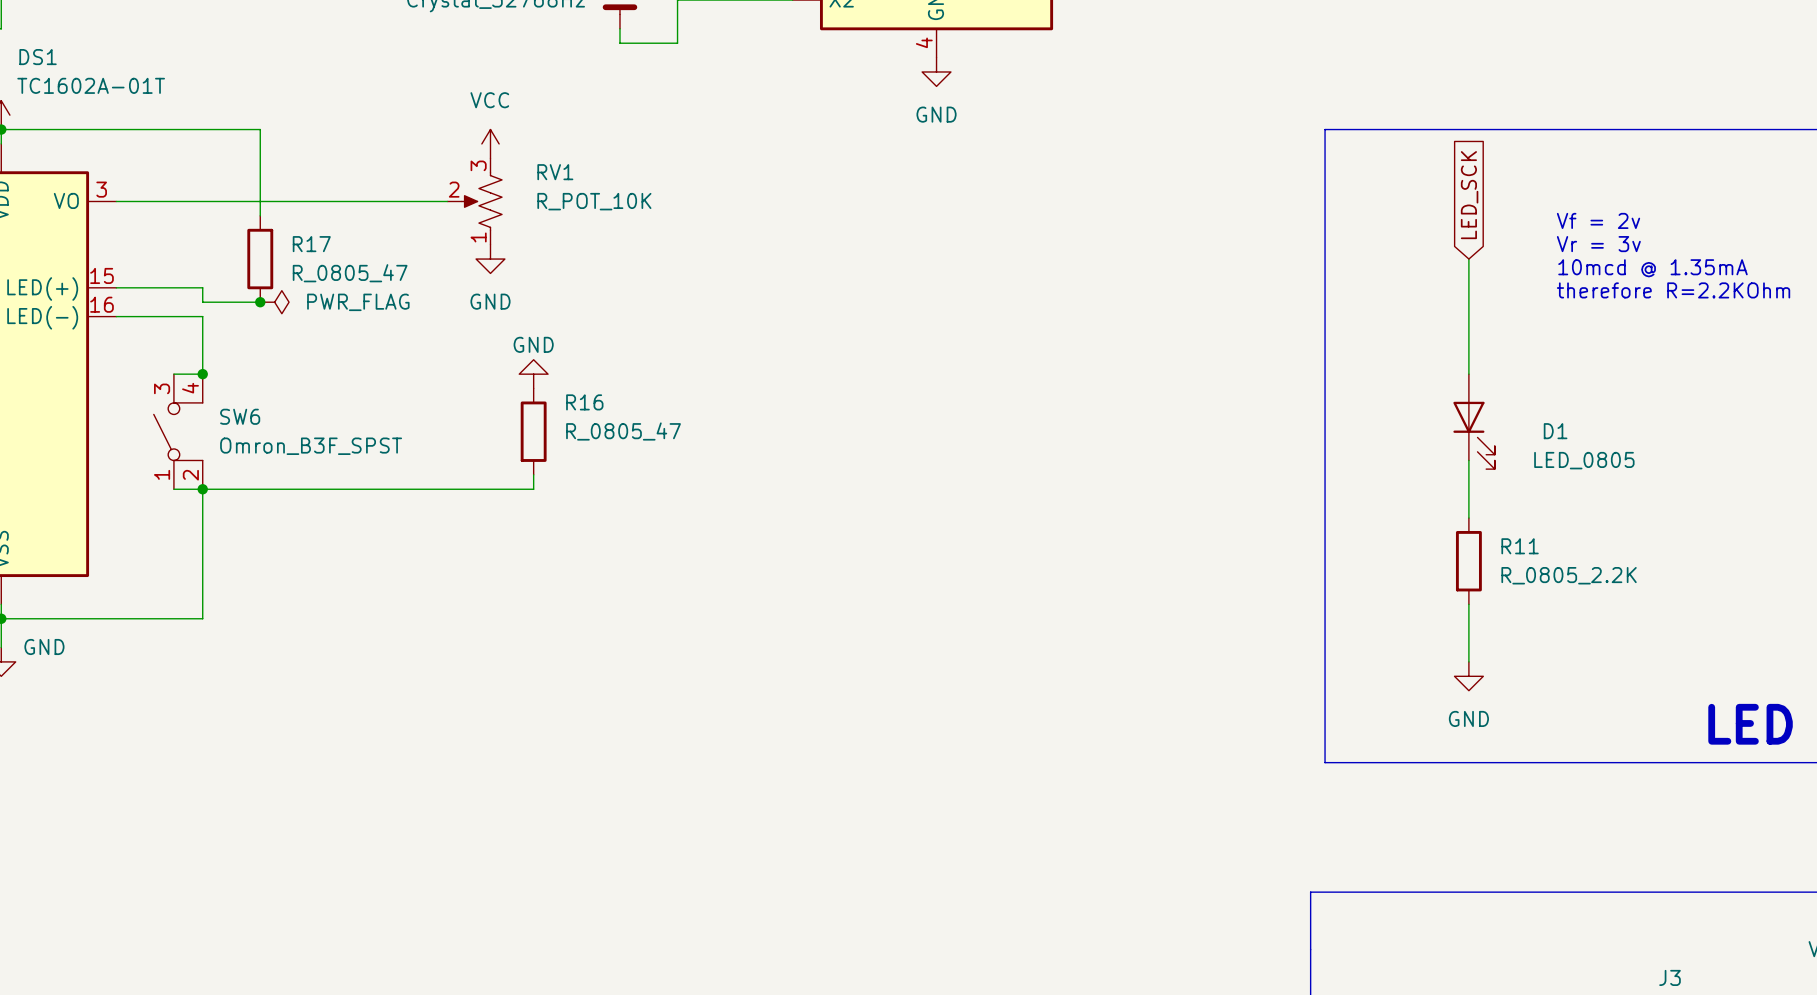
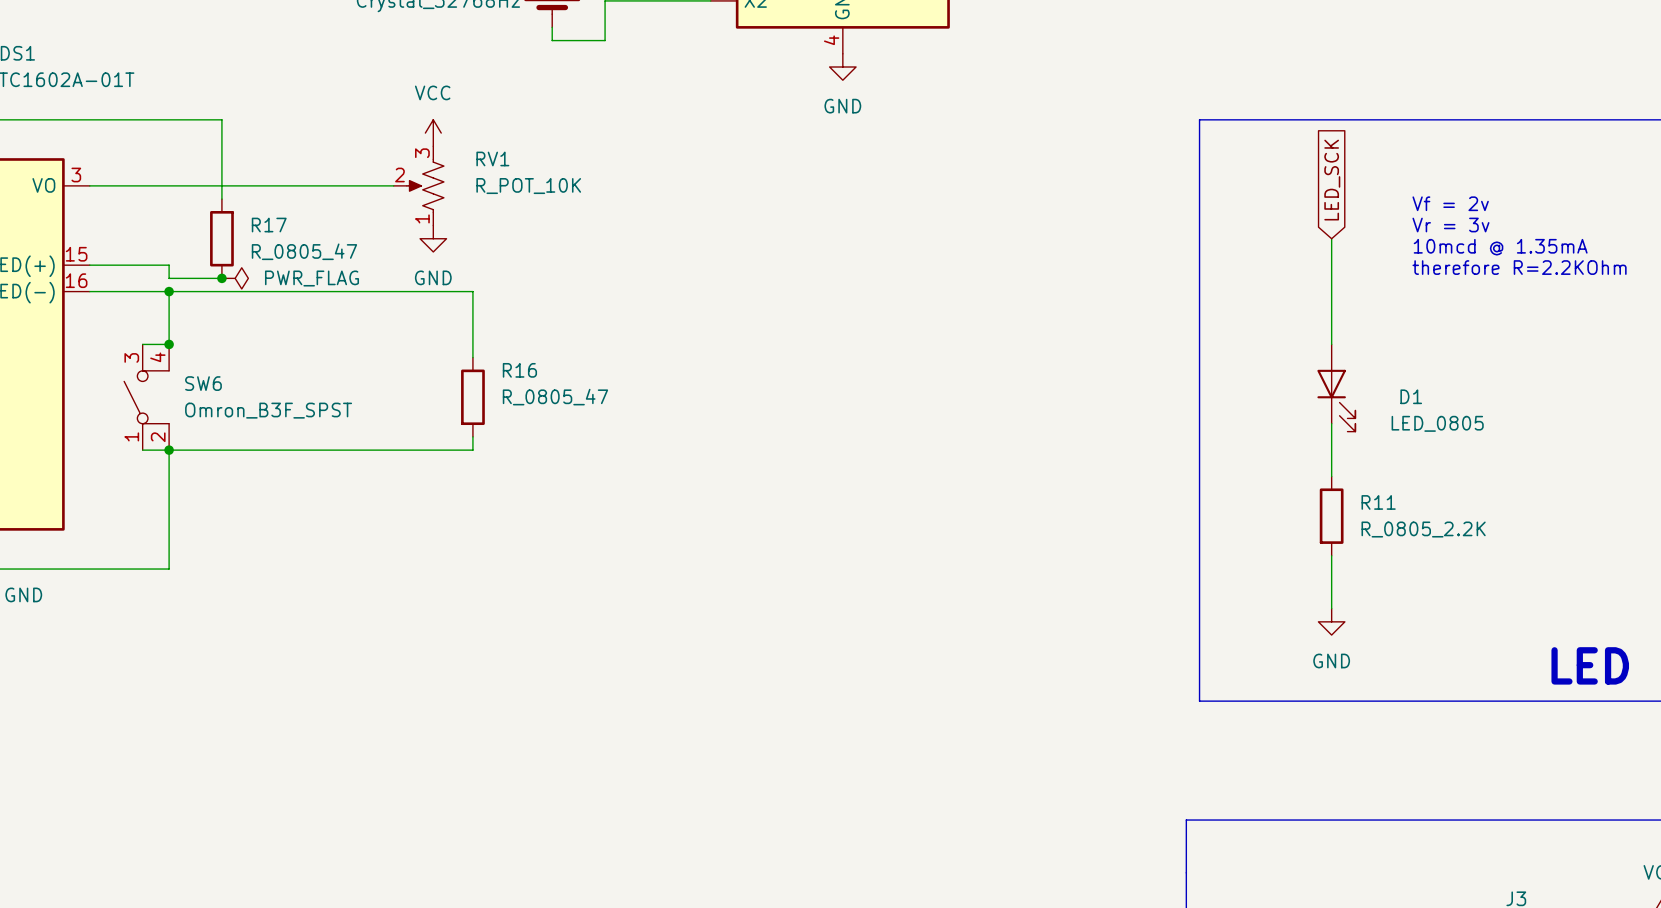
wire: none -> (169, 291) (472, 291) (472, 357)
junction: none -> (169, 291)
power symbol: GND (533, 374) -> none

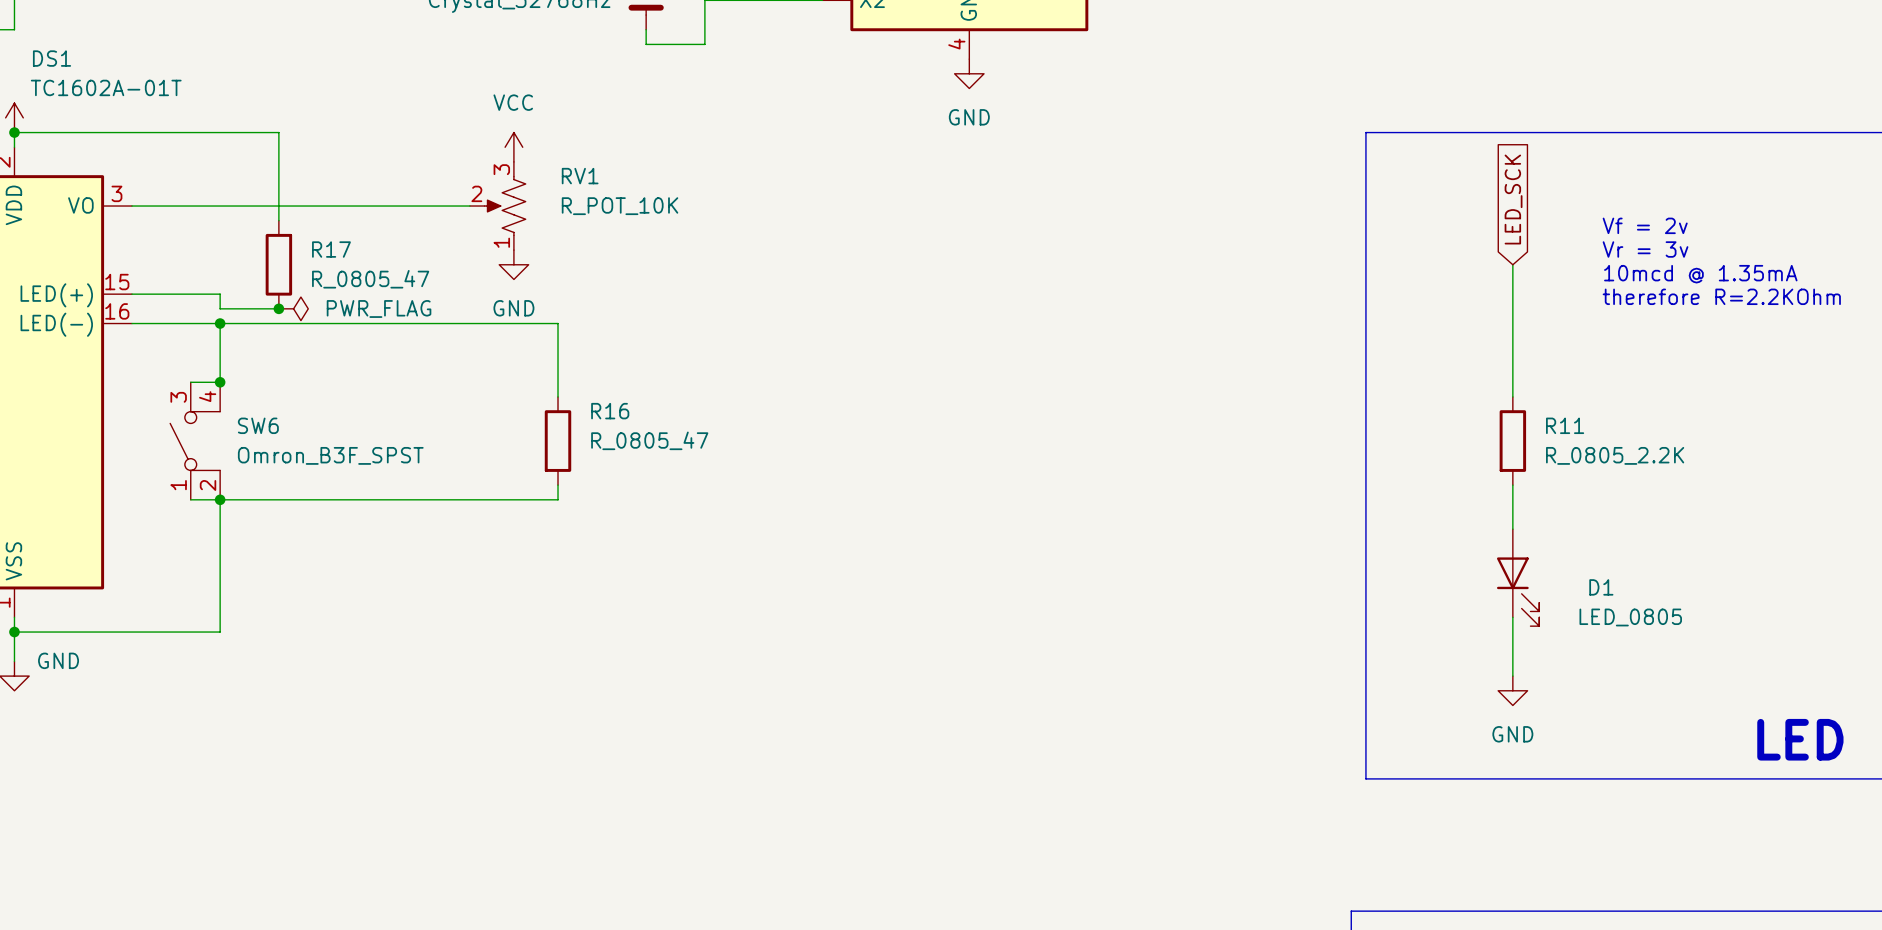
D1 position: (1336, 388) -> (1518, 577)
R11 position: (1331, 516) -> (1512, 441)

